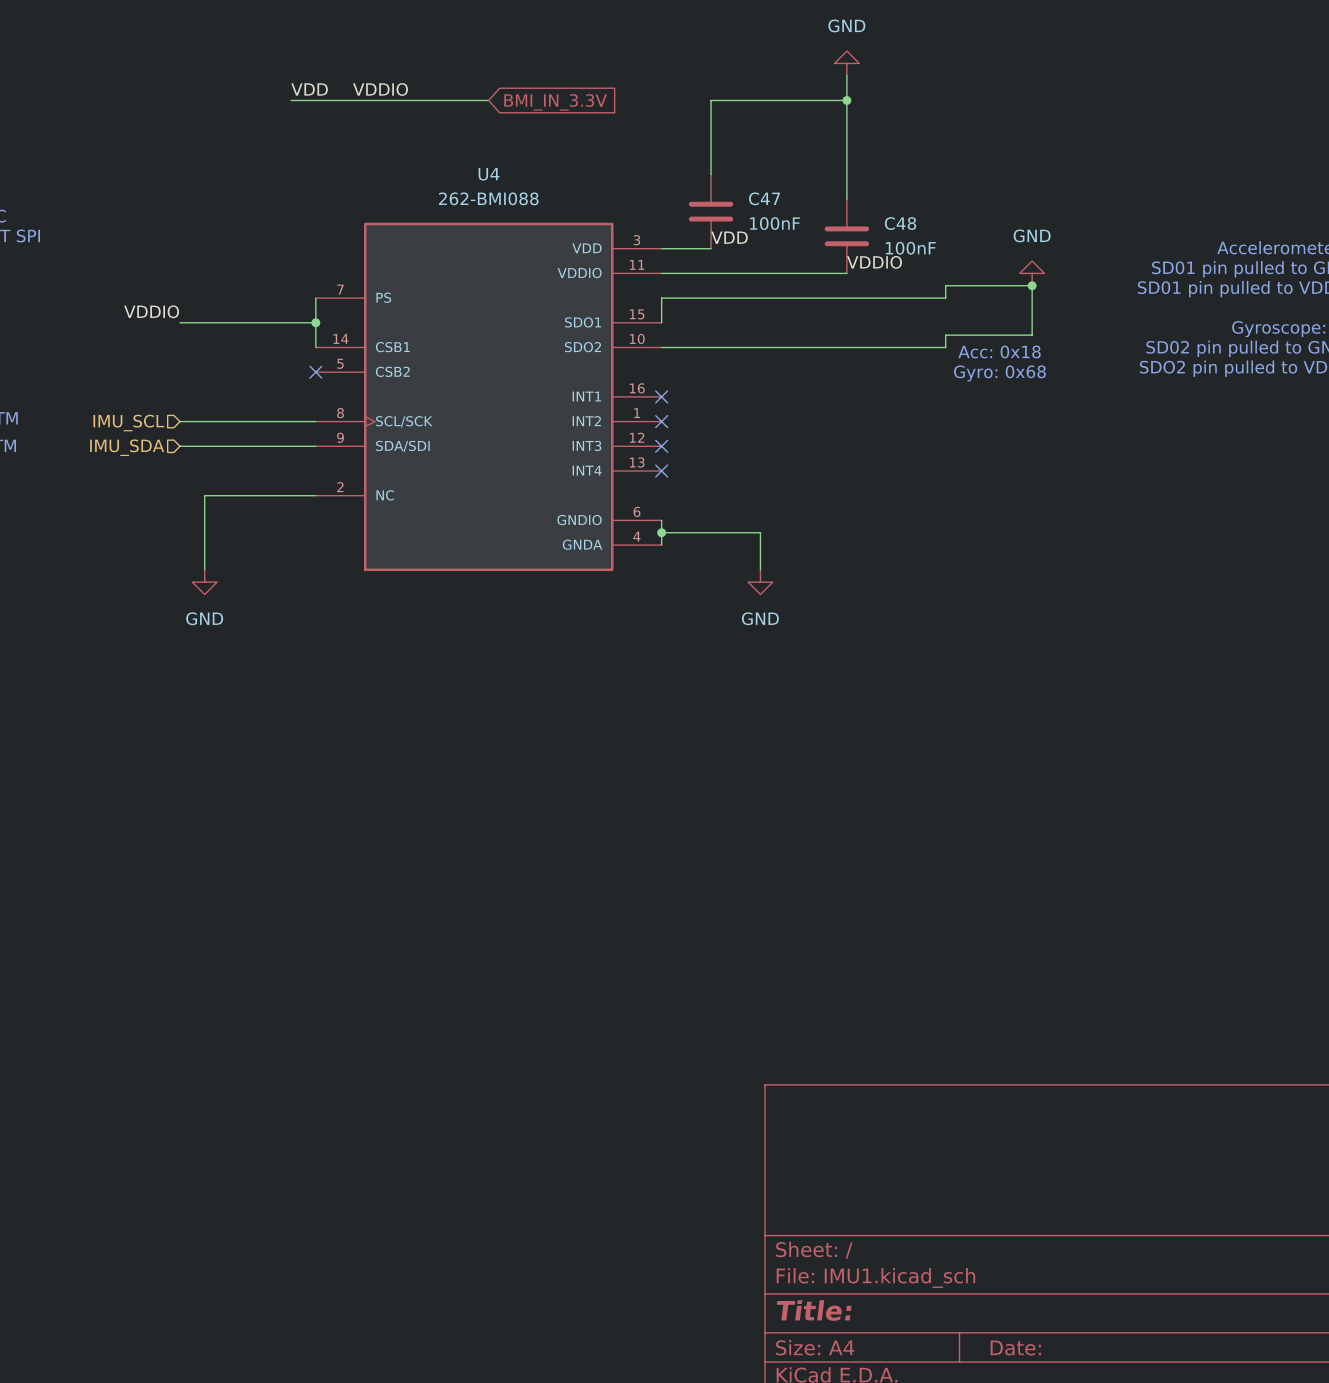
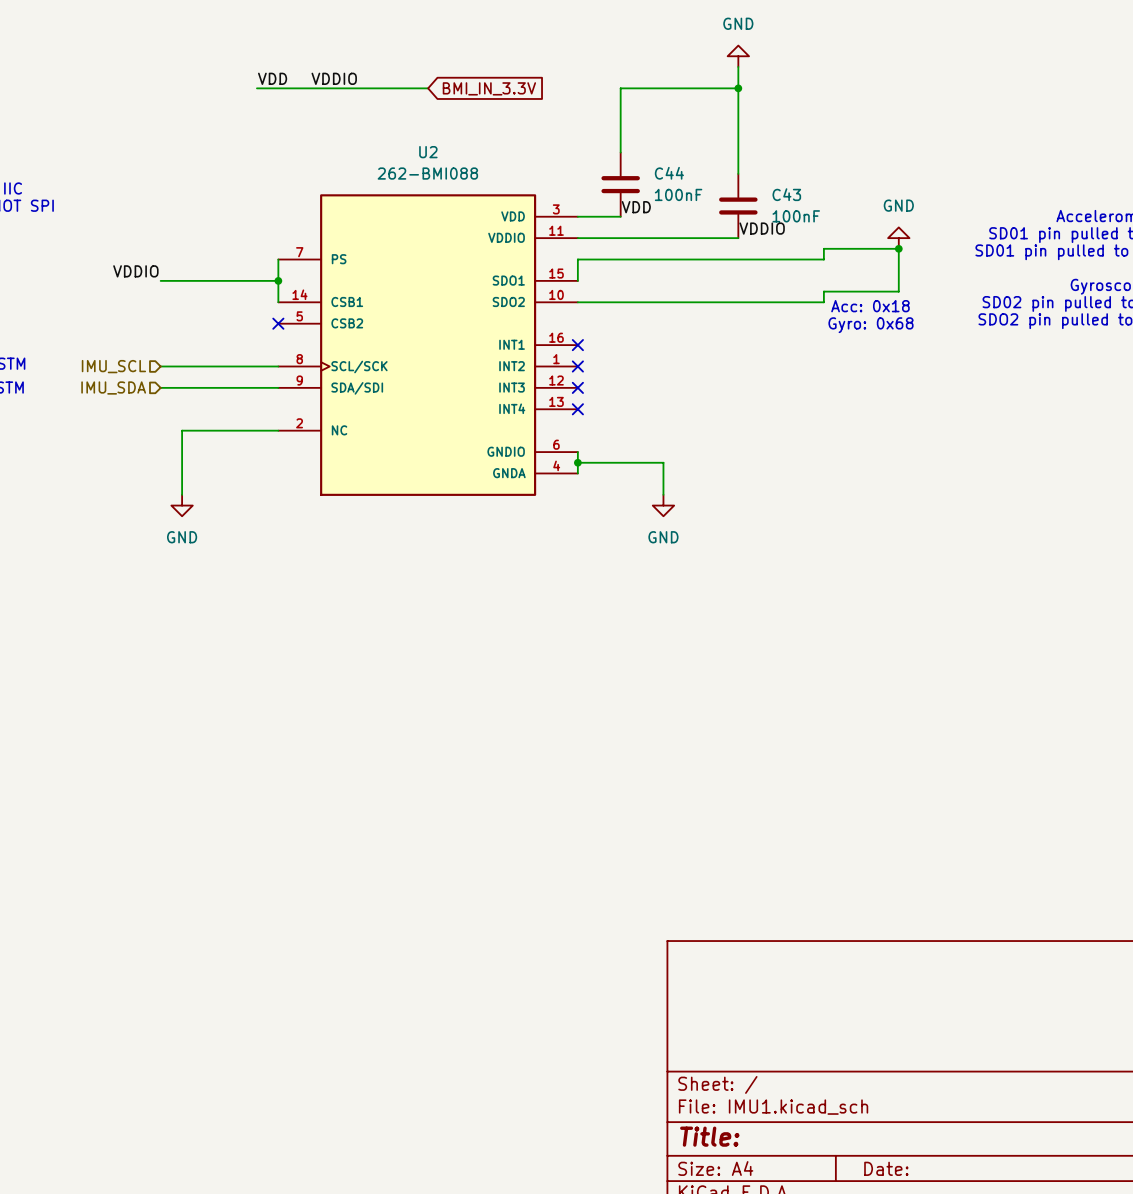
U4 name: U4 (489, 174) -> U2 (428, 152)
C47 name: C47 (764, 198) -> C44 (669, 173)
C48 name: C48 (900, 223) -> C43 (786, 194)

